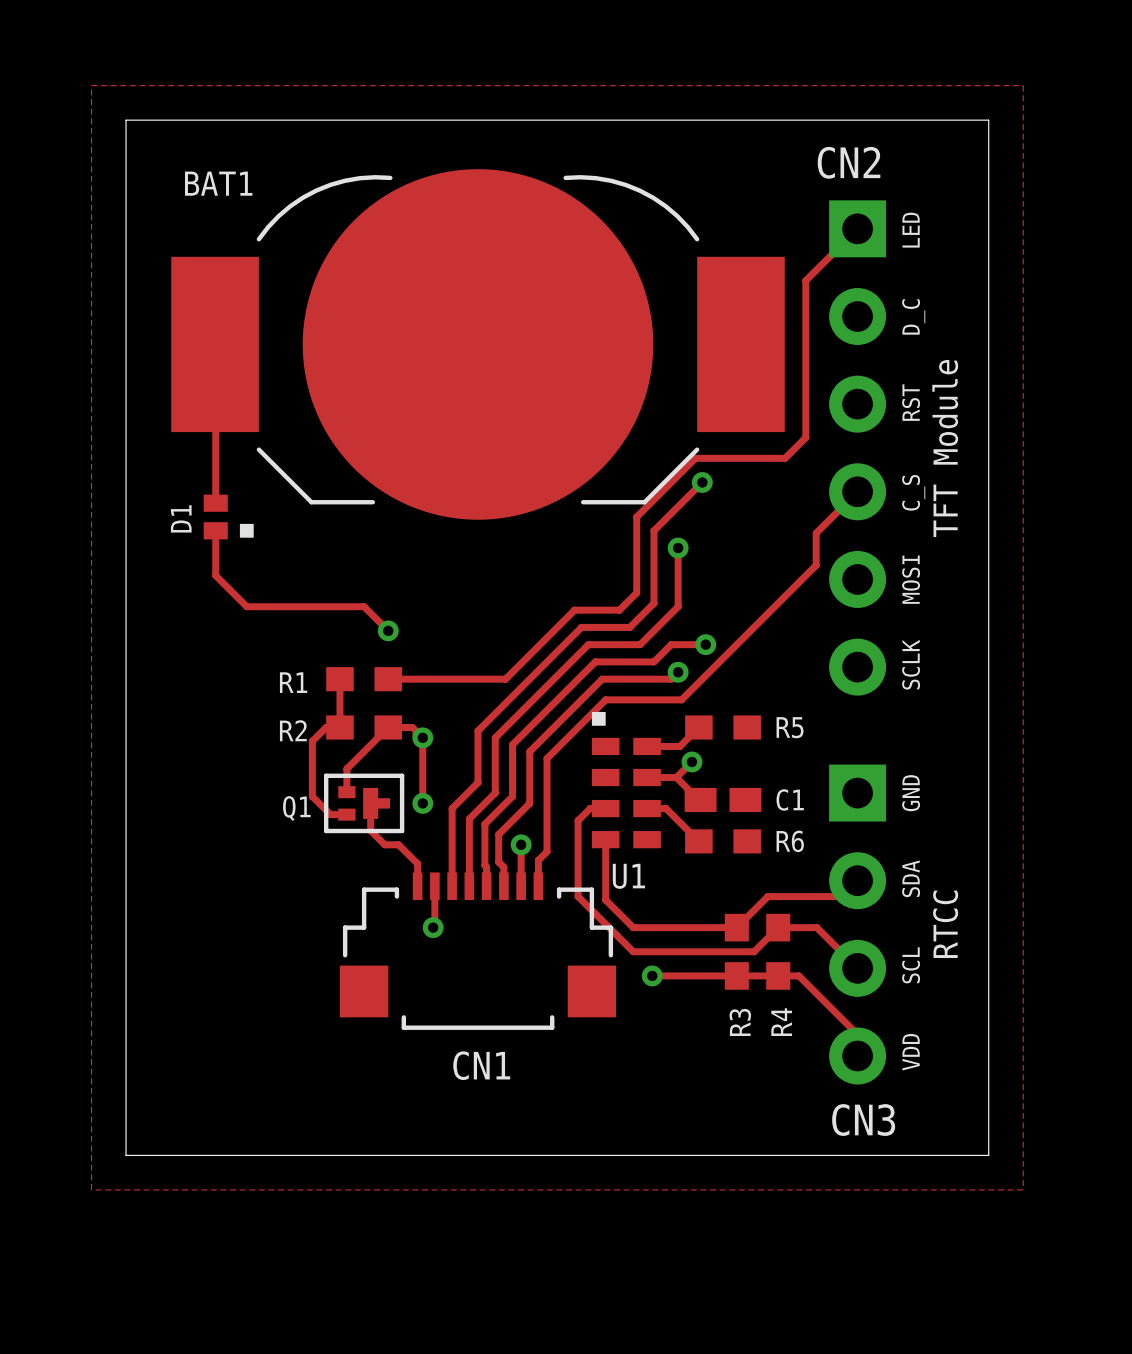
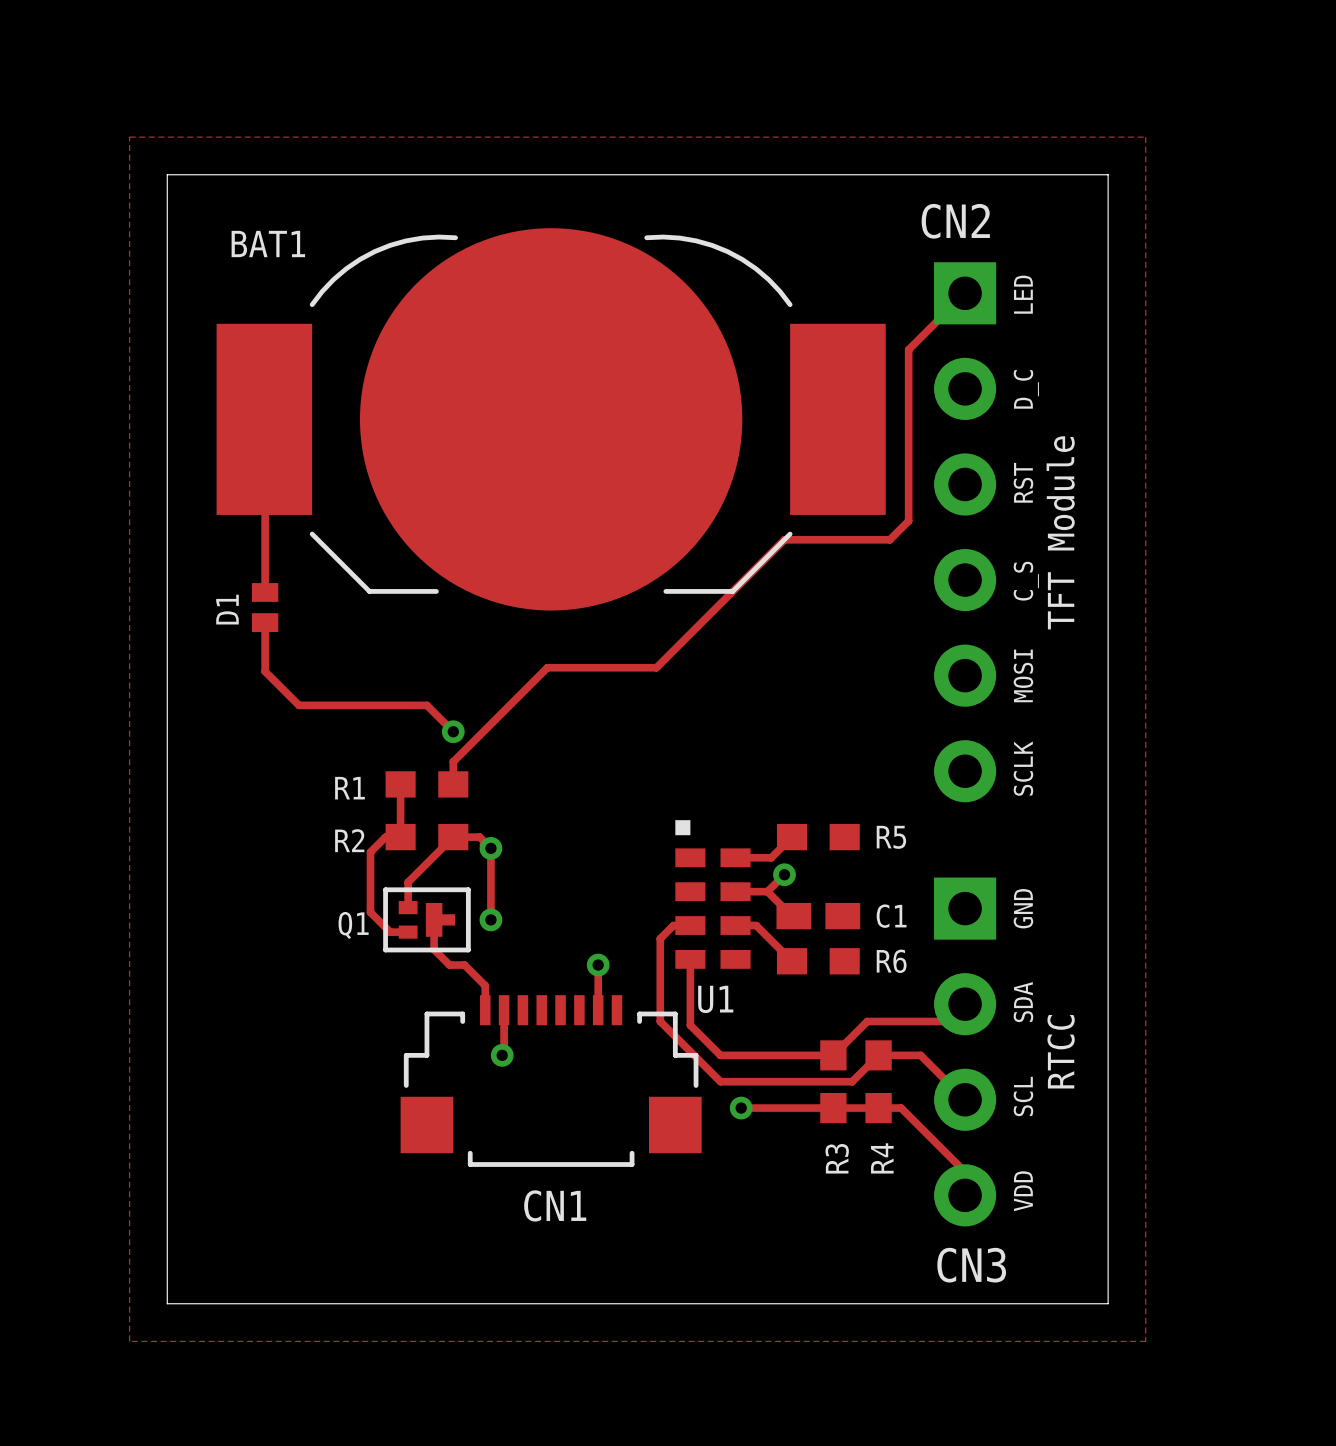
track: (788, 454) (785, 458) (695, 458) (636, 516) (636, 592) (619, 610) (574, 610) (505, 679) (388, 679) -> (889, 539) (784, 539) (656, 667) (547, 667) (453, 761) (453, 784)
track: (702, 482) (654, 530) (654, 603) (629, 627) (581, 627) (478, 730) (478, 782) (452, 808) (452, 886) -> none
via: (702, 482) -> none
track: (857, 491) (816, 533) (816, 565) (681, 699) (605, 699) (547, 758) (547, 851) (538, 860) (538, 886) -> none
drawing: [239, 523, 254, 538] -> none
track: (678, 548) (678, 606) (640, 644) (588, 644) (495, 737) (495, 793) (469, 818) (469, 886) -> none
via: (678, 548) -> none
track: (705, 644) (671, 644) (654, 661) (595, 661) (512, 744) (512, 796) (484, 824) (486, 886) -> none
via: (705, 644) -> none
track: (678, 672) (671, 679) (602, 679) (529, 751) (529, 803) (498, 834) (498, 862) (503, 867) (503, 886) -> none
via: (678, 672) -> none

